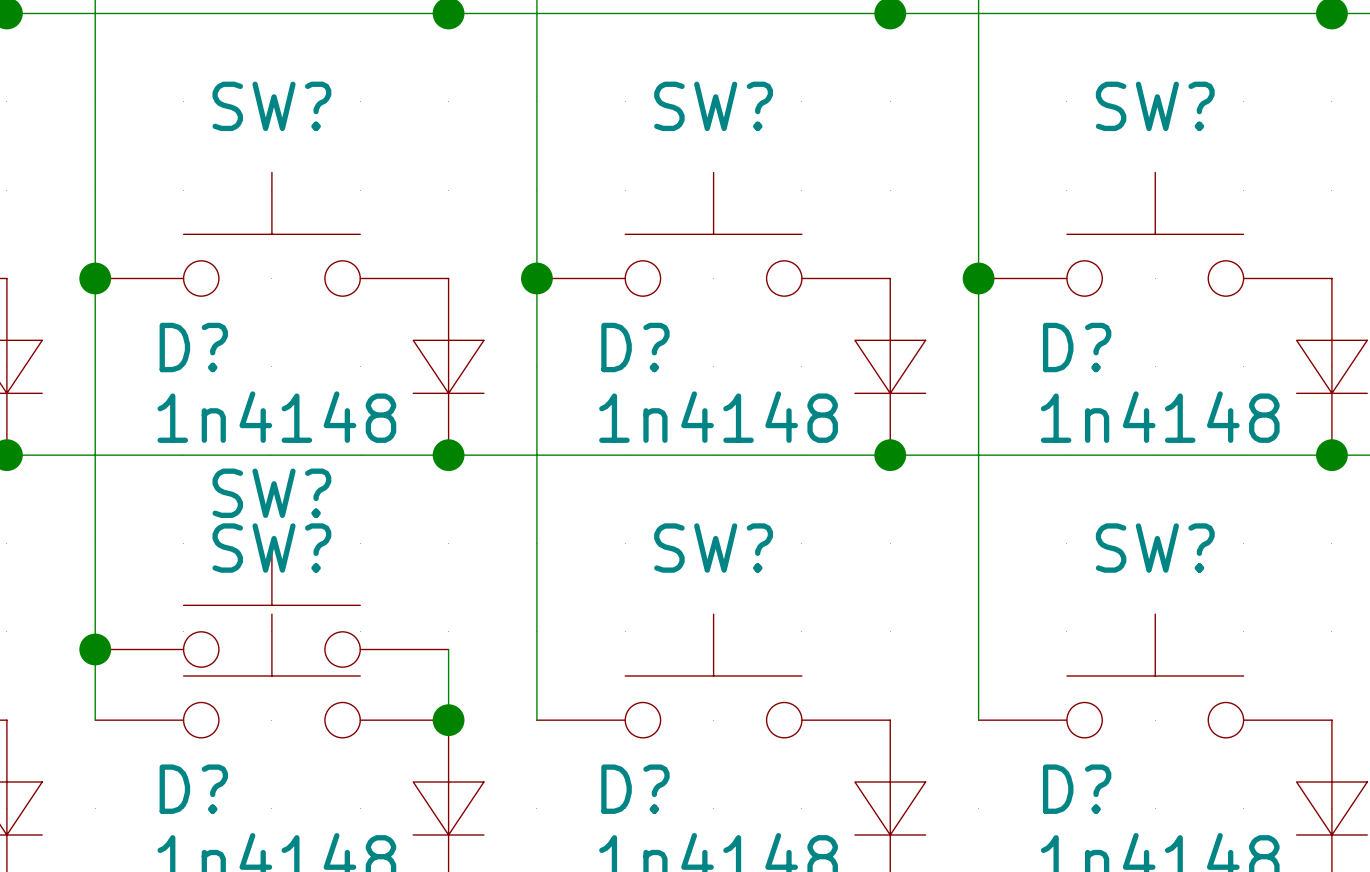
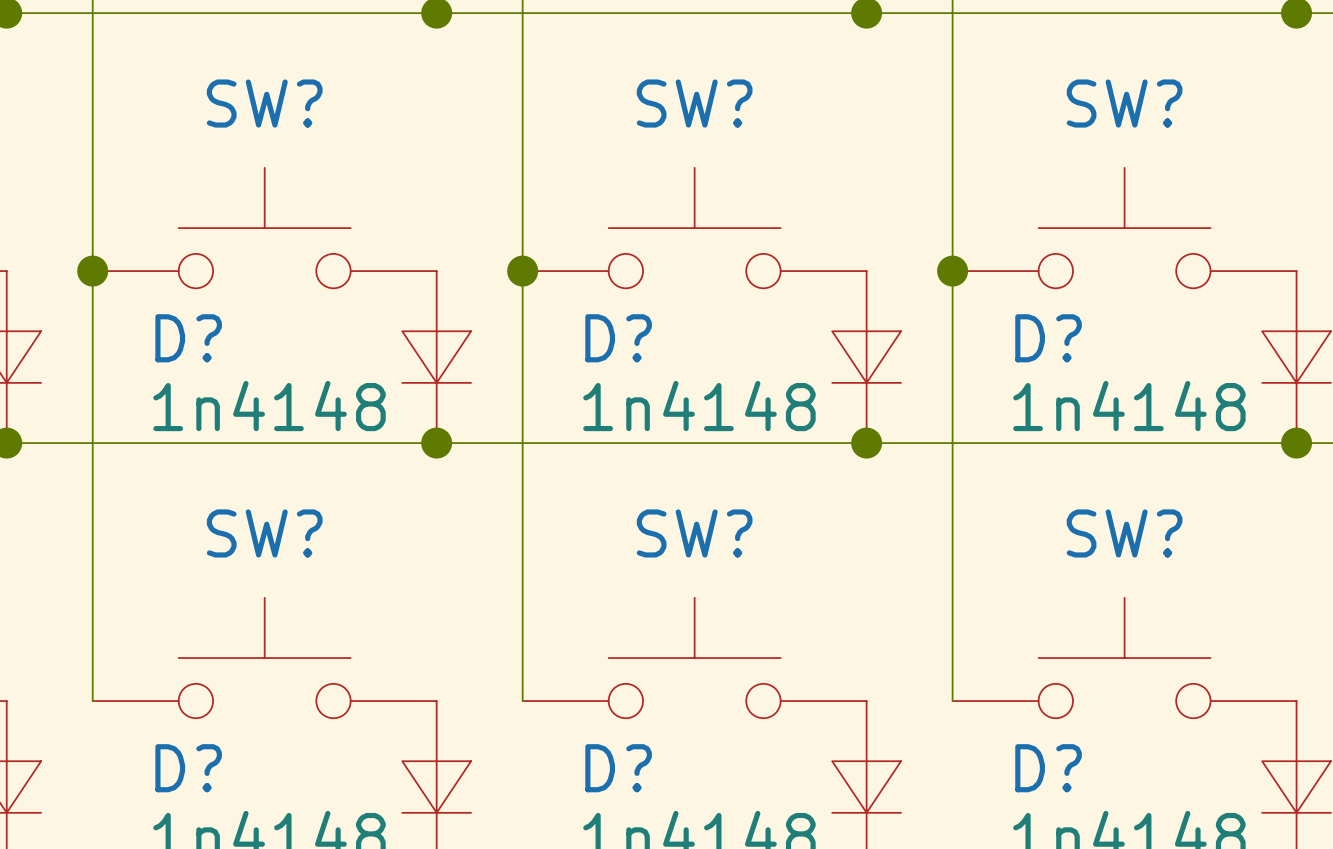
SW?: (271, 605) -> none
junction: (95, 649) -> none
wire: (448, 649) (448, 720) -> none
junction: (448, 720) -> none

